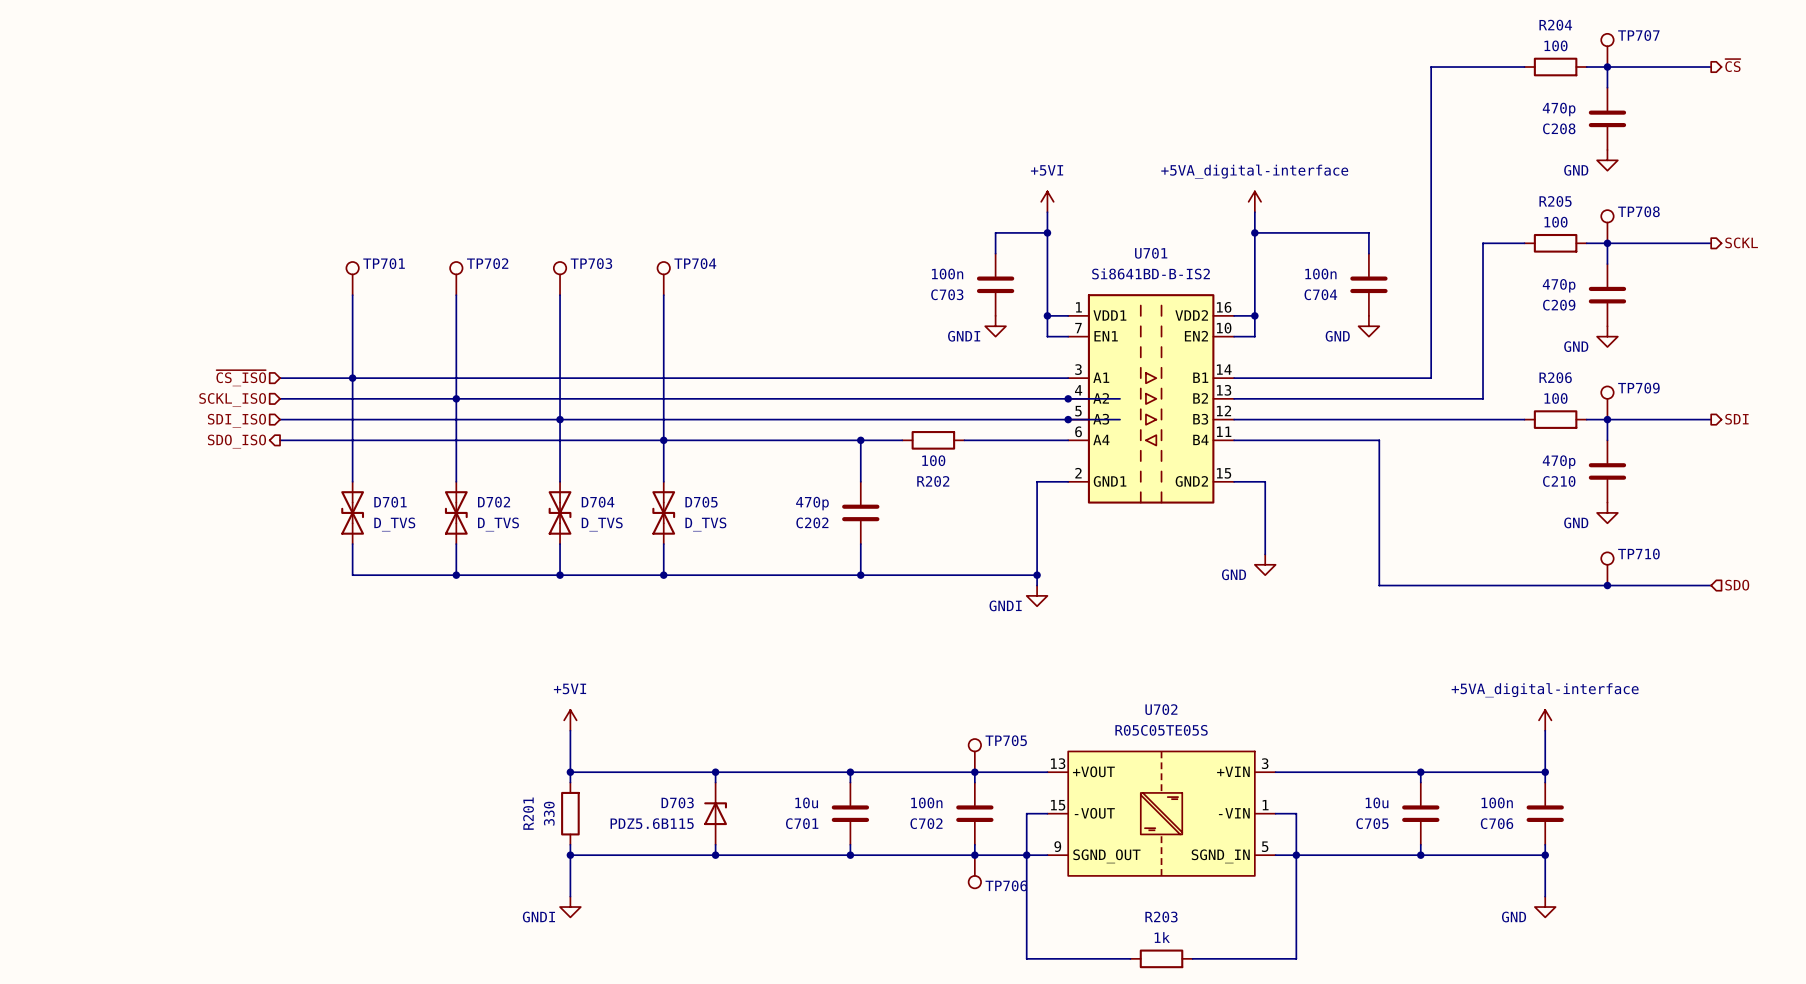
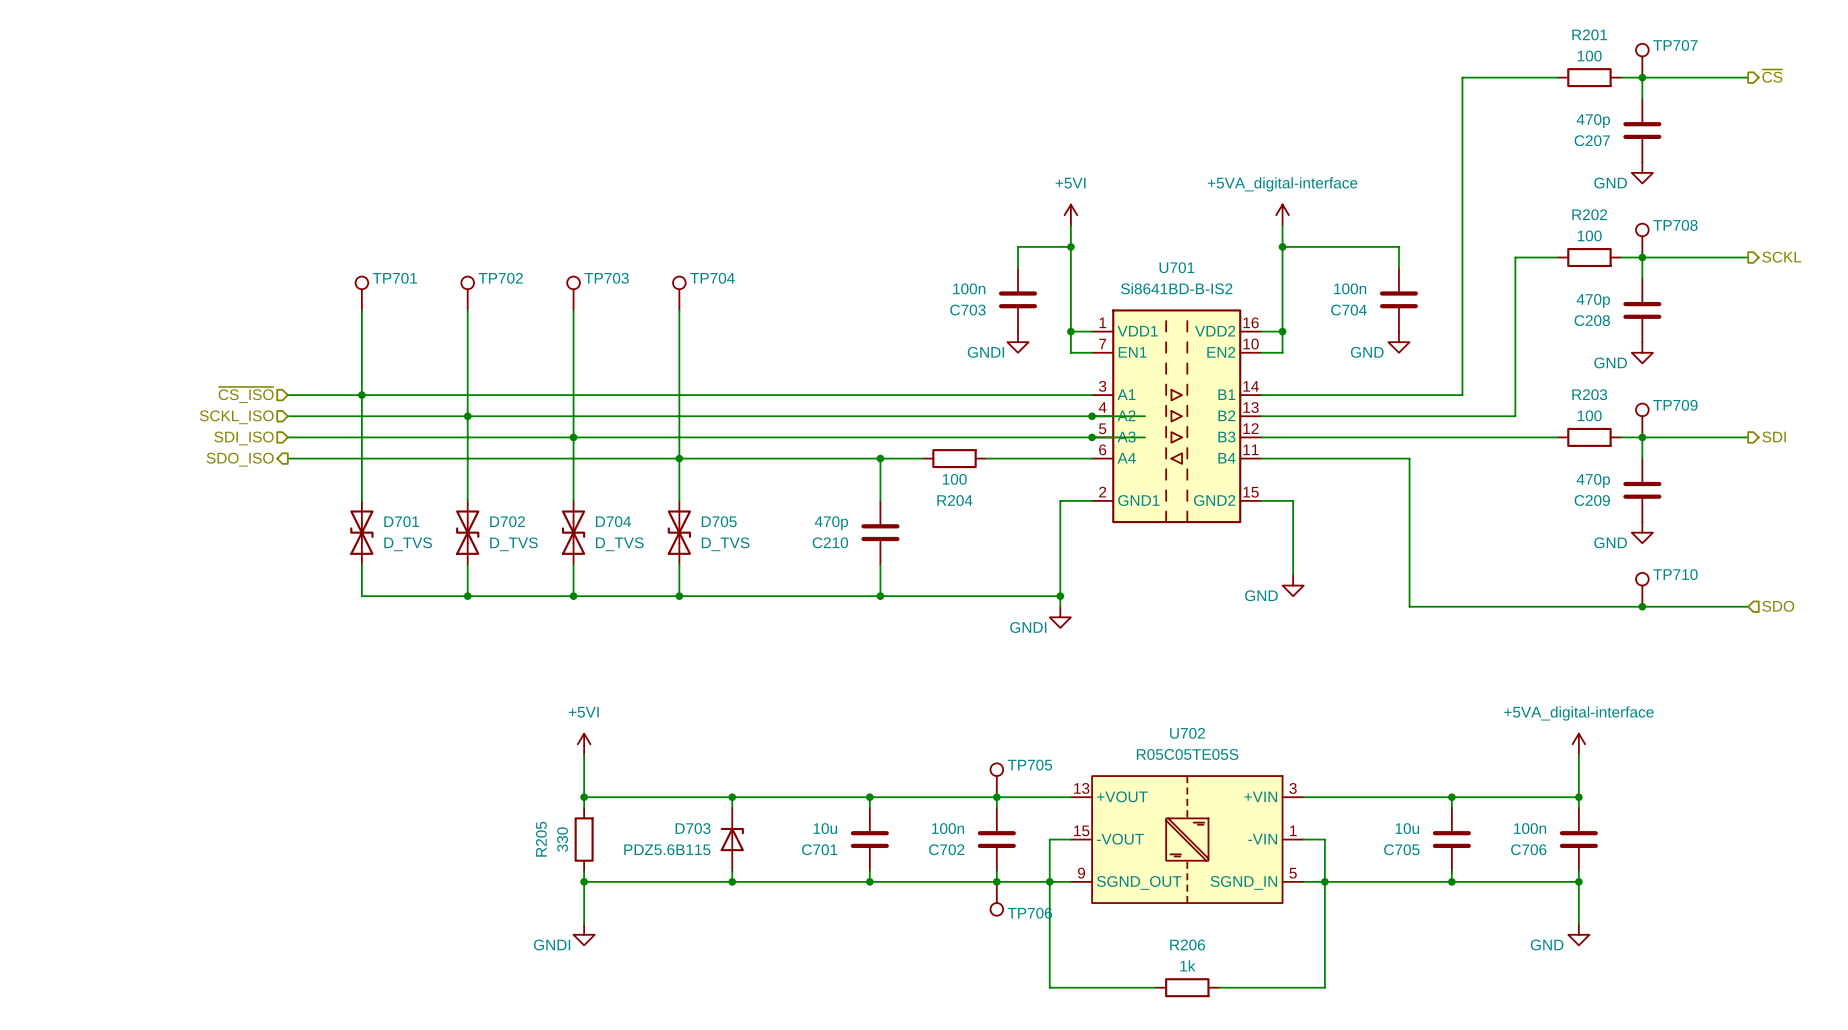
R204 name: R204 (1555, 25) -> R201 (1589, 34)
C208 name: C208 (1559, 128) -> C207 (1592, 140)
R205 name: R205 (1555, 201) -> R202 (1589, 214)
C209 name: C209 (1559, 305) -> C208 (1592, 320)
R206 name: R206 (1555, 377) -> R203 (1589, 394)
R202 name: R202 (933, 481) -> R204 (954, 500)
C210 name: C210 (1559, 481) -> C209 (1592, 500)
C202 name: C202 (812, 522) -> C210 (830, 542)
R201 name: R201 (528, 813) -> R205 (541, 839)
R203 name: R203 (1161, 917) -> R206 (1187, 944)

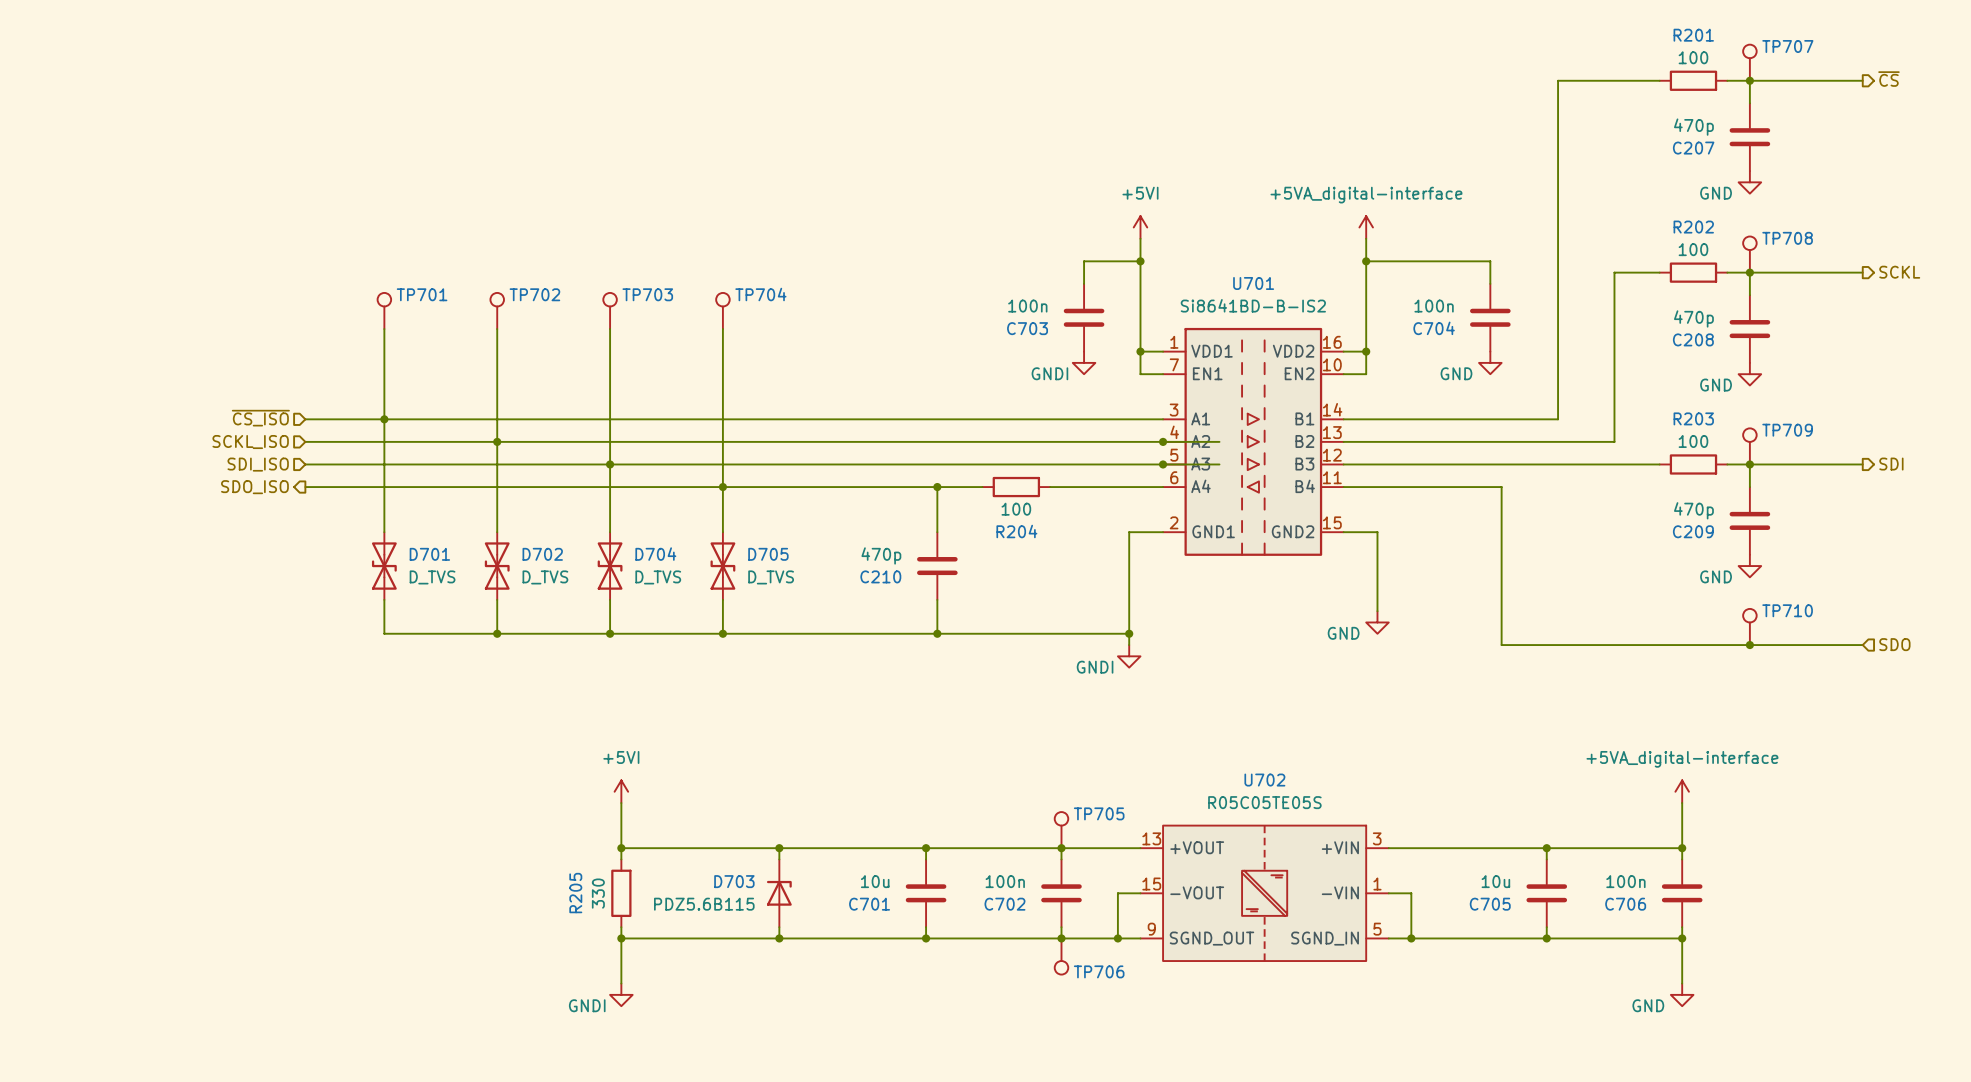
wire: (1049, 881) (1049, 987) (1155, 987) -> none
wire: (1324, 881) (1324, 987) (1219, 987) -> none
R206: 1k (1187, 987) -> none

